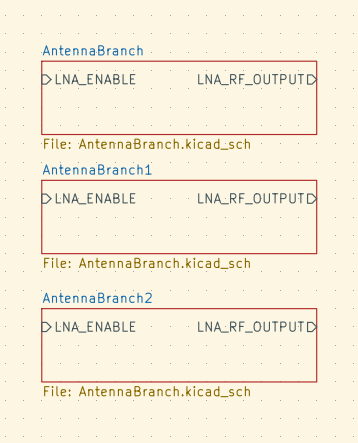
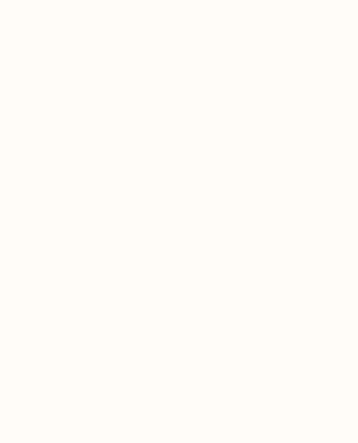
sheet pin: LNA_ENABLE (95, 79) -> none
sheet pin: LNA_RF_OUTPUT (251, 79) -> none
sheet AntennaBranch: File: AntennaBranch.kicad_sch (179, 97) -> none
sheet pin: LNA_ENABLE (95, 198) -> none
sheet pin: LNA_RF_OUTPUT (251, 198) -> none
sheet AntennaBranch1: File: AntennaBranch.kicad_sch (179, 217) -> none
sheet pin: LNA_ENABLE (95, 327) -> none
sheet pin: LNA_RF_OUTPUT (251, 327) -> none
sheet AntennaBranch2: File: AntennaBranch.kicad_sch (179, 345) -> none

